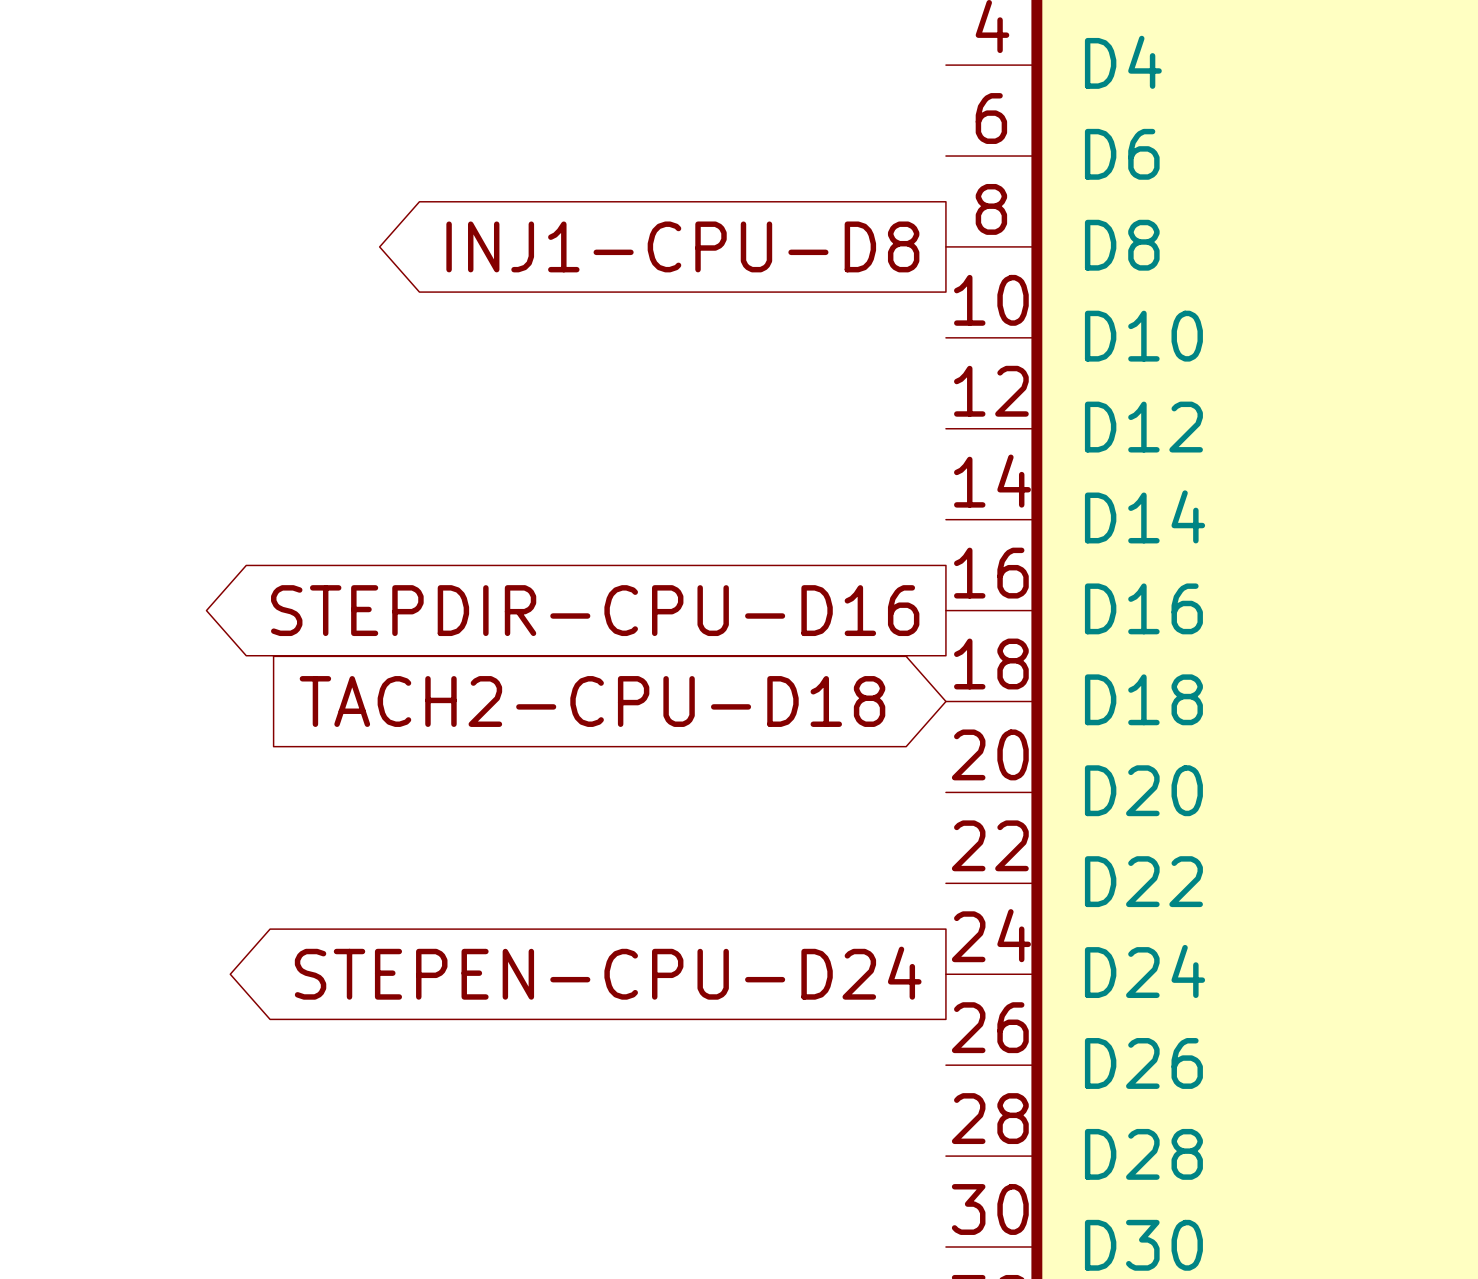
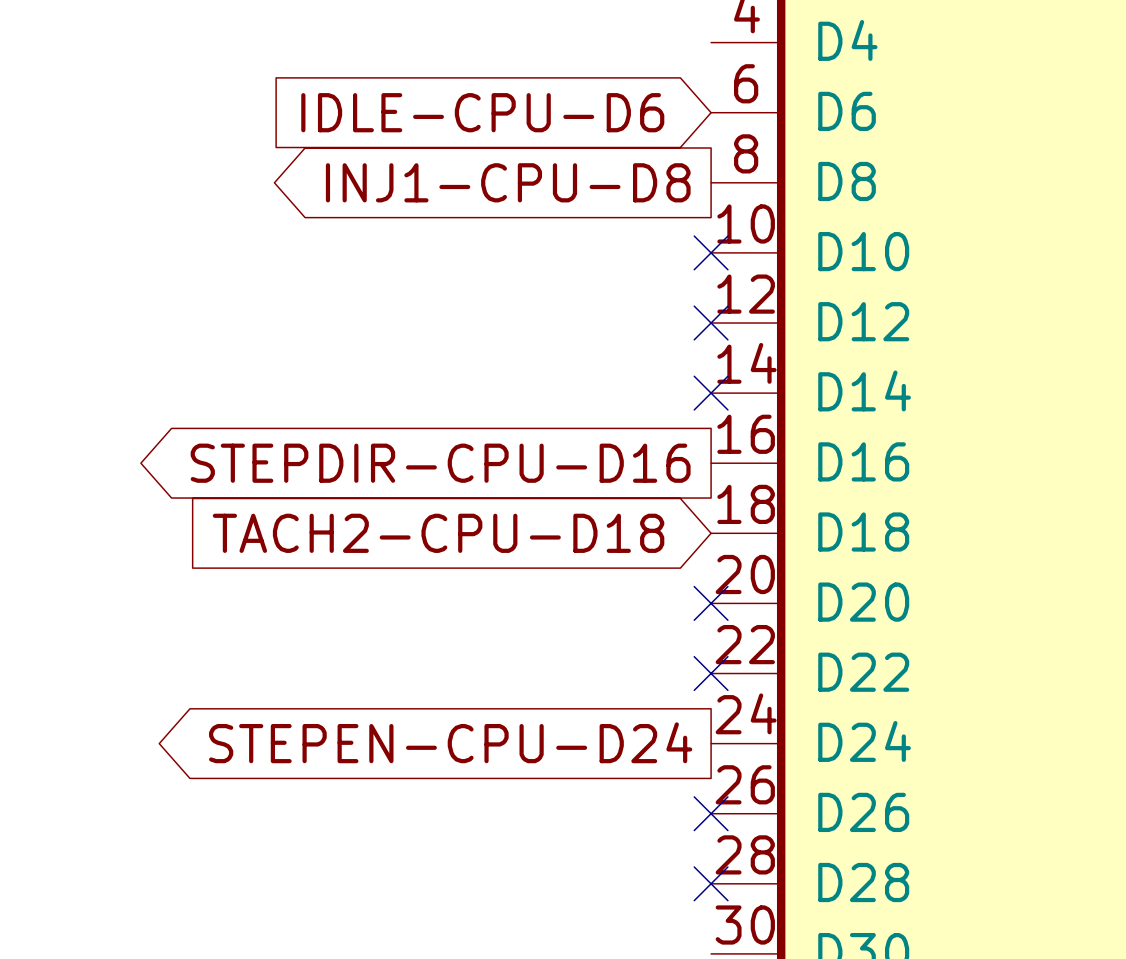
global label: none -> IDLE-CPU-D6 (482, 112)
no-connect mark: none -> (711, 252)
no-connect mark: none -> (711, 323)
no-connect mark: none -> (711, 393)
no-connect mark: none -> (711, 603)
no-connect mark: none -> (711, 673)
no-connect mark: none -> (711, 813)
no-connect mark: none -> (711, 883)

